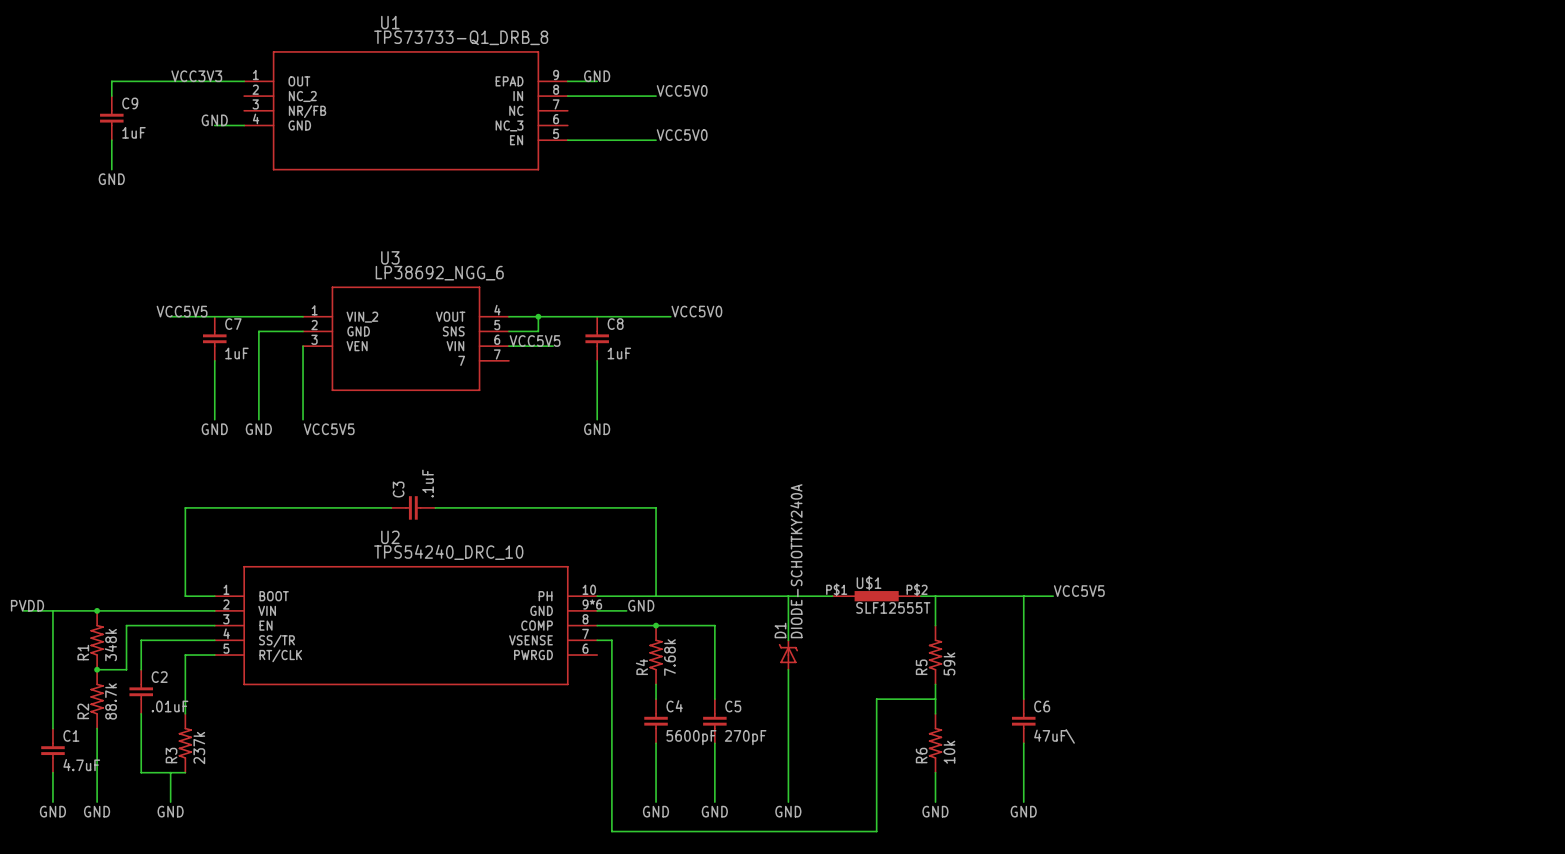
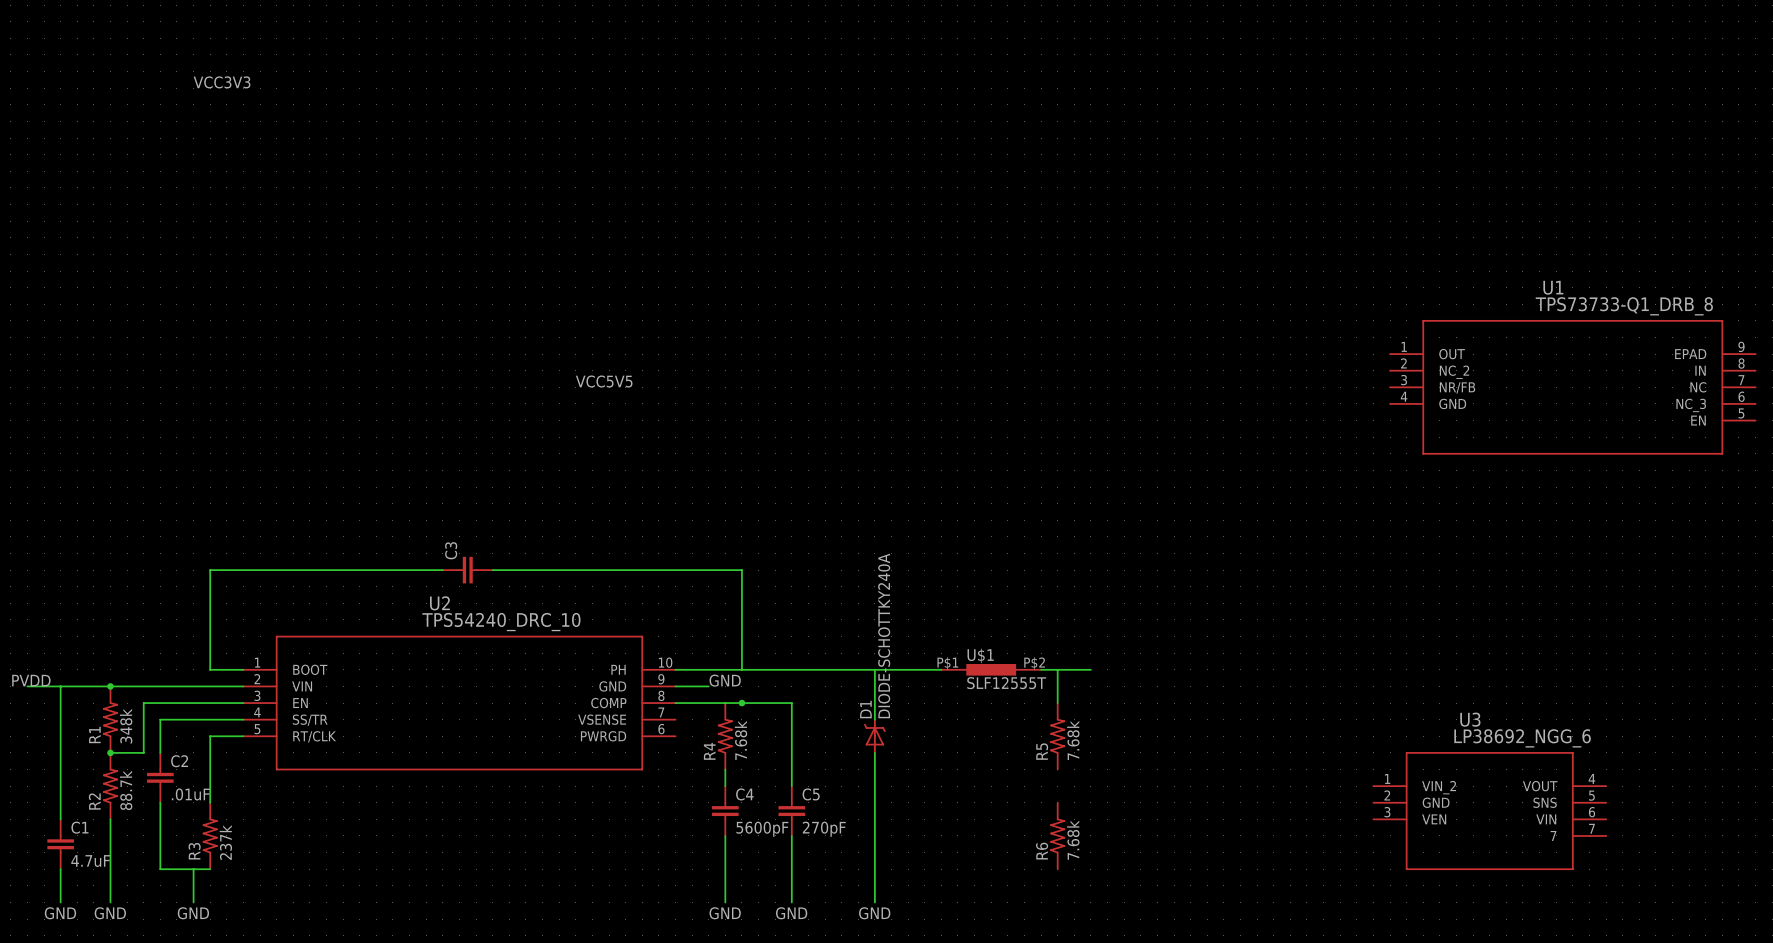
label: GND (597, 76) -> none
wire: (244, 81) (111, 81) (111, 96) -> none
wire: (567, 81) (597, 81) -> none
label: VCC5V0 (682, 90) -> none
wire: (567, 96) (656, 96) -> none
U1 position: (405, 110) -> (1572, 387)
C9: 1uF (111, 118) -> none
label: GND (214, 120) -> none
wire: (214, 125) (244, 125) -> none
label: VCC5V0 (682, 135) -> none
wire: (111, 140) (111, 169) -> none
wire: (567, 140) (656, 140) -> none
label: GND (111, 179) -> none
label: VCC5V5 (182, 311) -> none
label: VCC5V0 (696, 311) -> none
wire: (170, 316) (303, 316) -> none
wire: (508, 316) (670, 316) -> none
wire: (538, 316) (538, 331) (508, 331) -> none
junction: (538, 316) -> none
wire: (303, 331) (258, 331) (258, 419) -> none
C7: 1uF (214, 338) -> none
U3 position: (405, 338) -> (1489, 811)
C8: 1uF (597, 338) -> none
wire: (303, 346) (303, 419) -> none
wire: (508, 346) (553, 346) -> none
wire: (214, 360) (214, 419) -> none
wire: (597, 360) (597, 419) -> none
label: GND (214, 429) -> none
label: GND (258, 429) -> none
label: VCC5V5 (329, 429) -> none
label: GND (597, 429) -> none
C3 value: .1uF (428, 483) -> none
label: VCC5V5 (1079, 591) -> none
wire: (788, 596) (788, 640) -> (874, 669) (874, 719)
wire: (964, 596) (1053, 596) -> none
wire: (1023, 596) (1023, 699) -> none
U2 pin number: 9*6 (592, 604) -> 9 (661, 679)
wire: (700, 625) (714, 625) (714, 699) -> (791, 703) (791, 786)
wire: (597, 640) (611, 640) (611, 831) (876, 831) (876, 699) (935, 699) -> none
R4 position: (656, 655) -> (725, 736)
D1 position: (788, 655) -> (874, 736)
R5 value: 59k (949, 663) -> 7.68k (1073, 740)
wire: (788, 669) (788, 802) -> (874, 752) (874, 902)
wire: (656, 684) (656, 699) -> (725, 769) (725, 786)
wire: (935, 684) (935, 713) -> none
C4 position: (656, 721) -> (725, 811)
C5 position: (714, 721) -> (791, 811)
C6: 47uF\ (1023, 721) -> none
wire: (656, 743) (656, 802) -> (725, 835) (725, 902)
wire: (714, 743) (714, 802) -> (791, 835) (791, 902)
wire: (1023, 743) (1023, 802) -> none
R6 value: 10k (949, 752) -> 7.68k (1073, 840)
wire: (935, 772) (935, 802) -> none
label position: GND (655, 811) -> GND (725, 913)
label position: GND (714, 811) -> GND (791, 913)
label position: GND (788, 811) -> GND (874, 913)
label: GND (935, 811) -> none
label: GND (1023, 811) -> none

